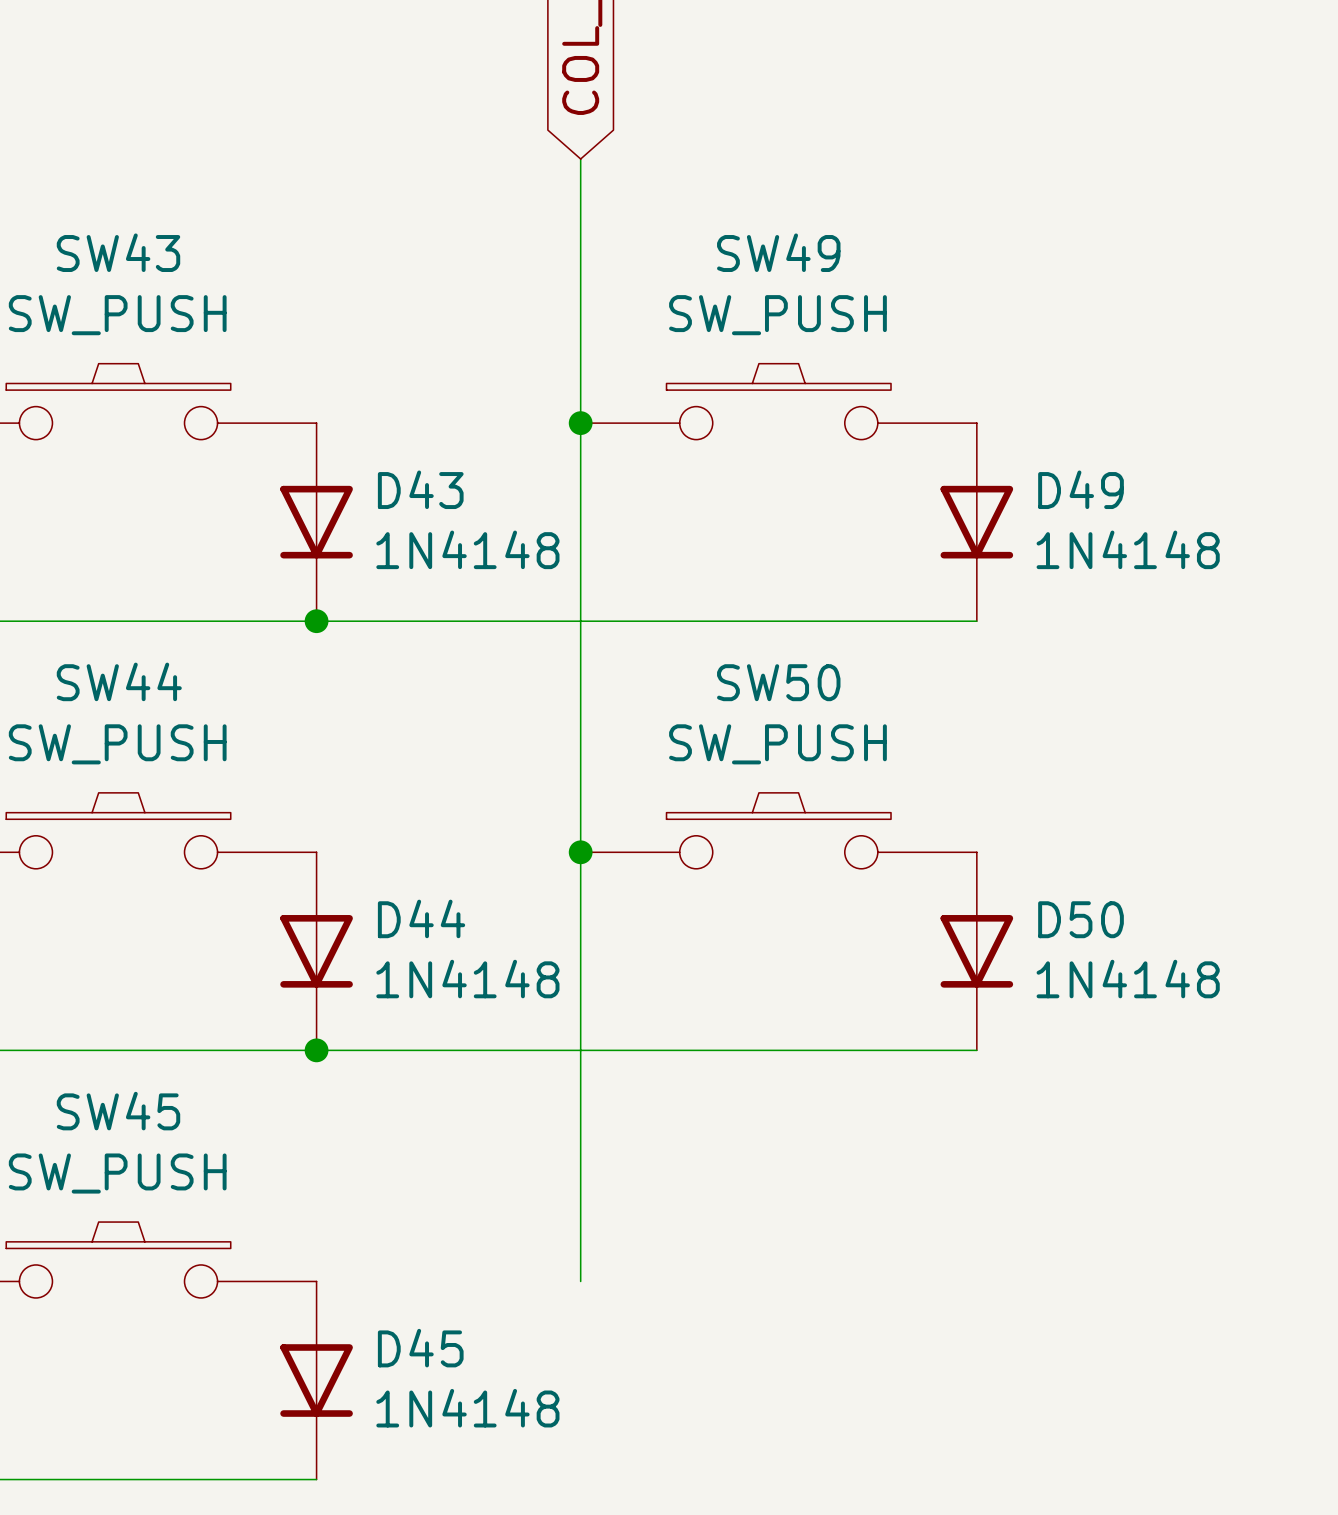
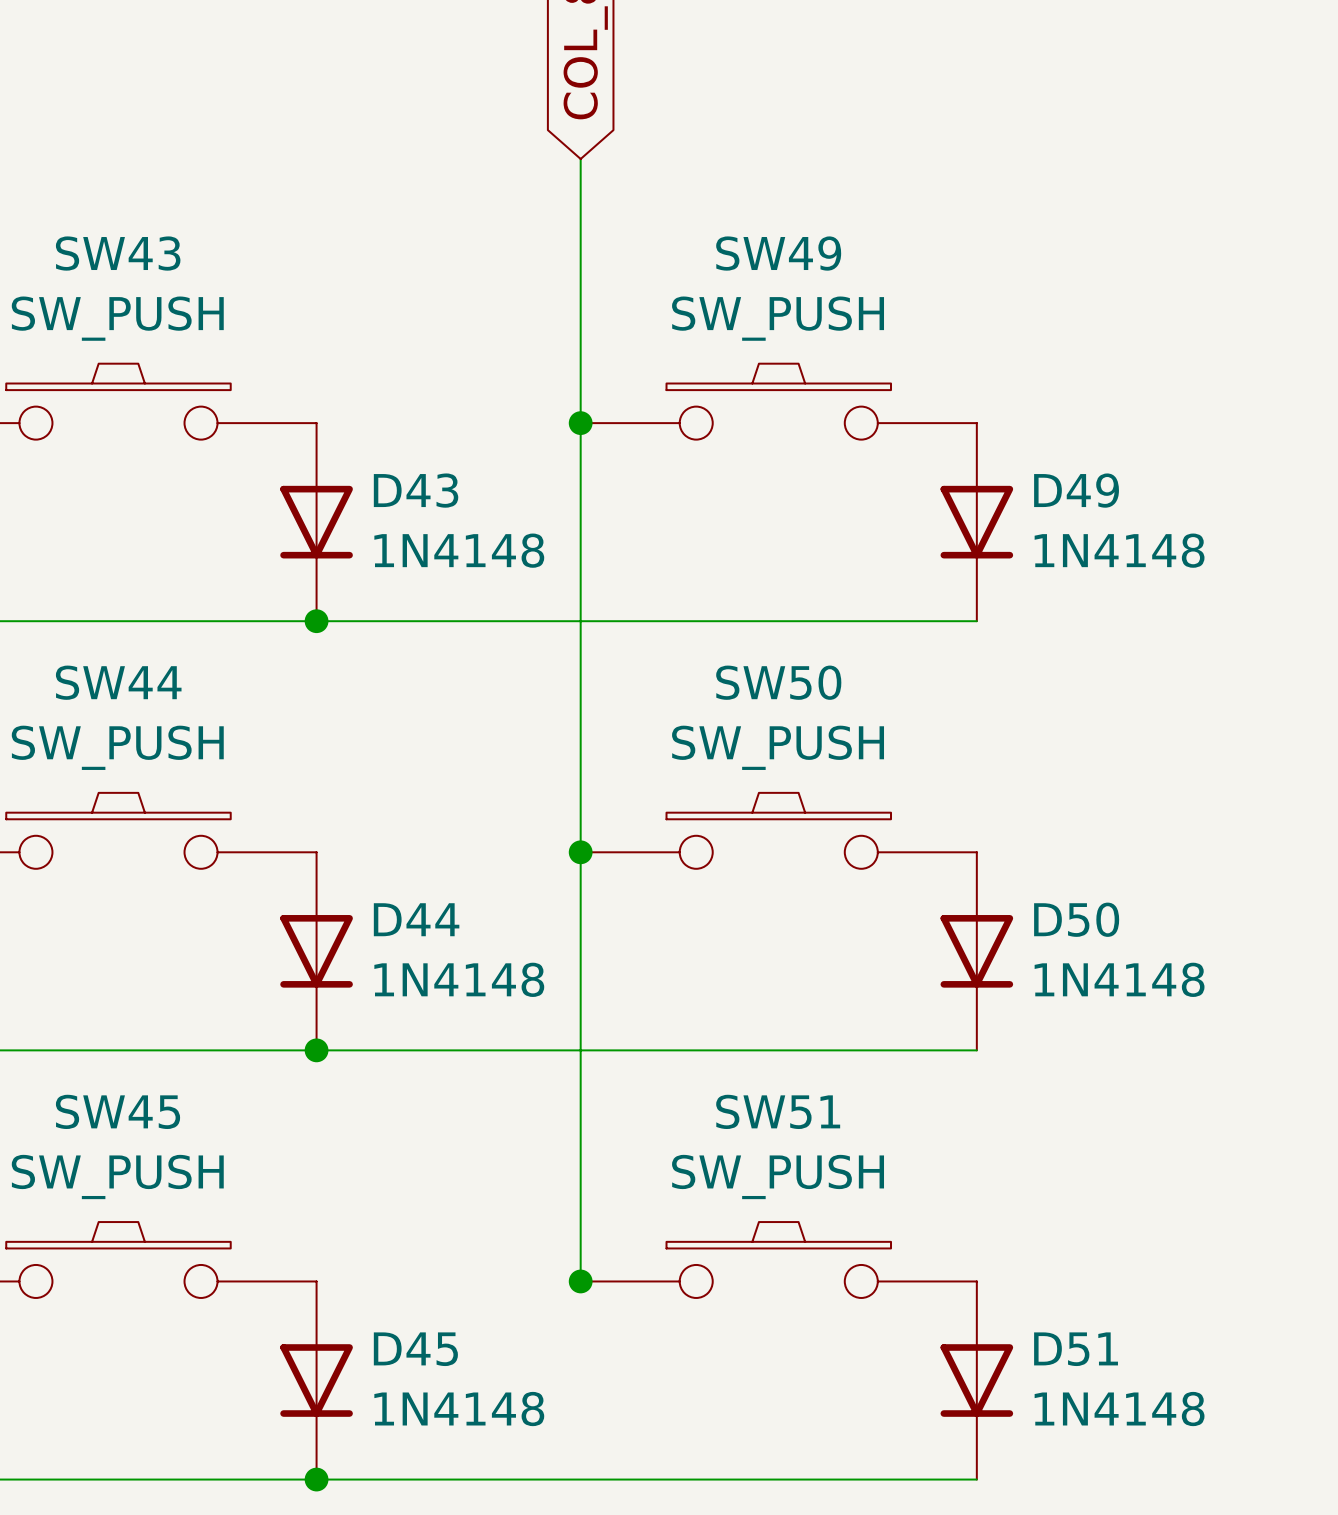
SW51: none -> SW_PUSH (778, 1260)
junction: none -> (580, 1281)
D51: none -> 1N4148 (976, 1380)
wire: none -> (316, 1479) (976, 1479)
junction: none -> (316, 1479)

